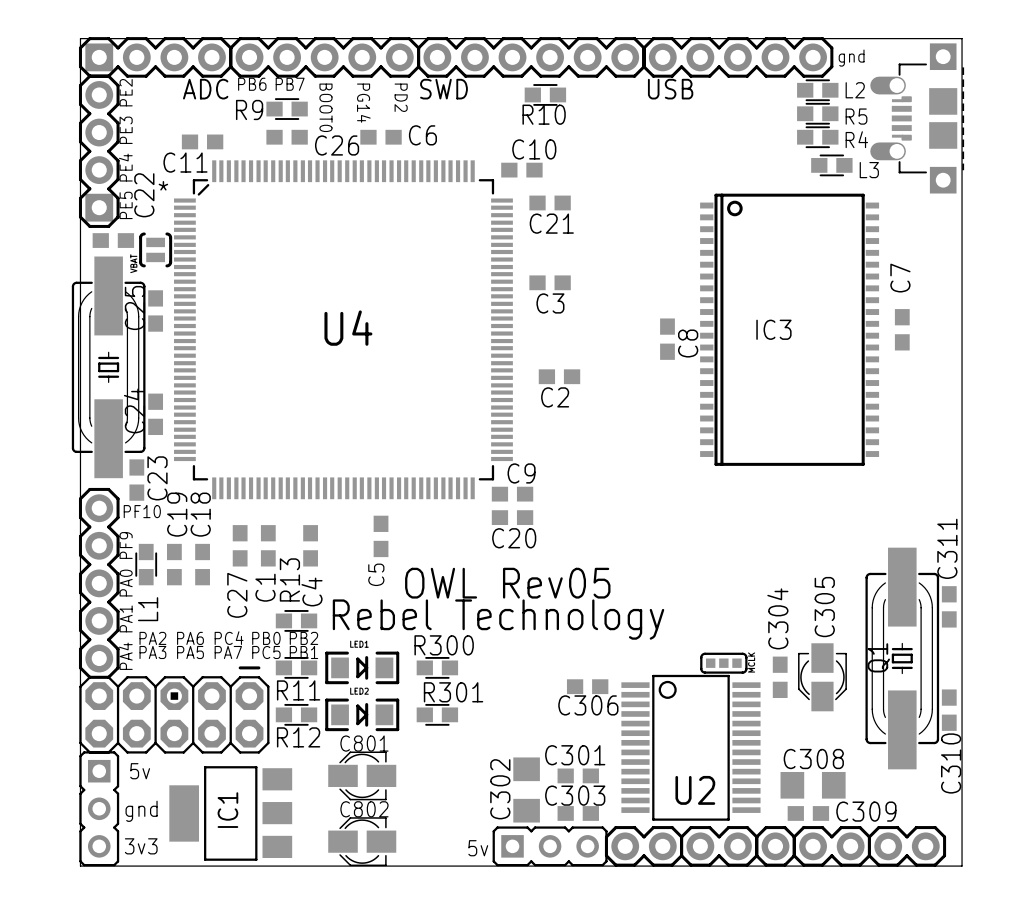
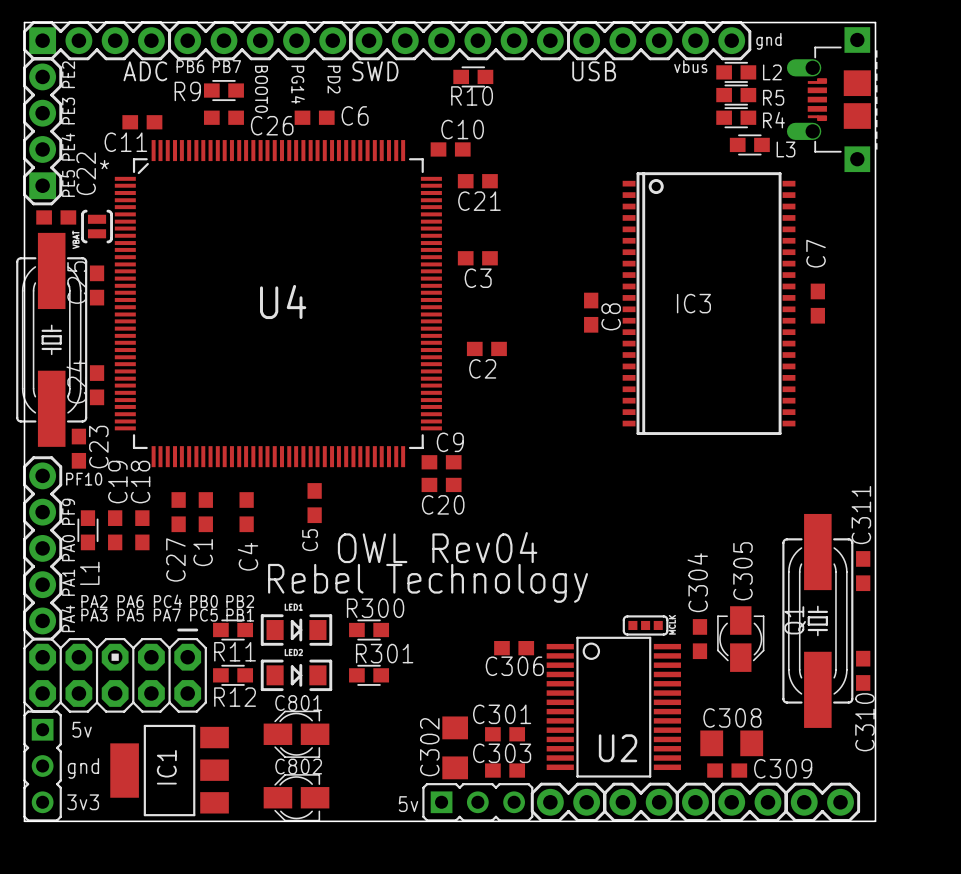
text: none -> vbus (690, 66)
text: OWL Rev05 (507, 583) -> OWL Rev04 (437, 547)
R13: (296, 620) -> none

